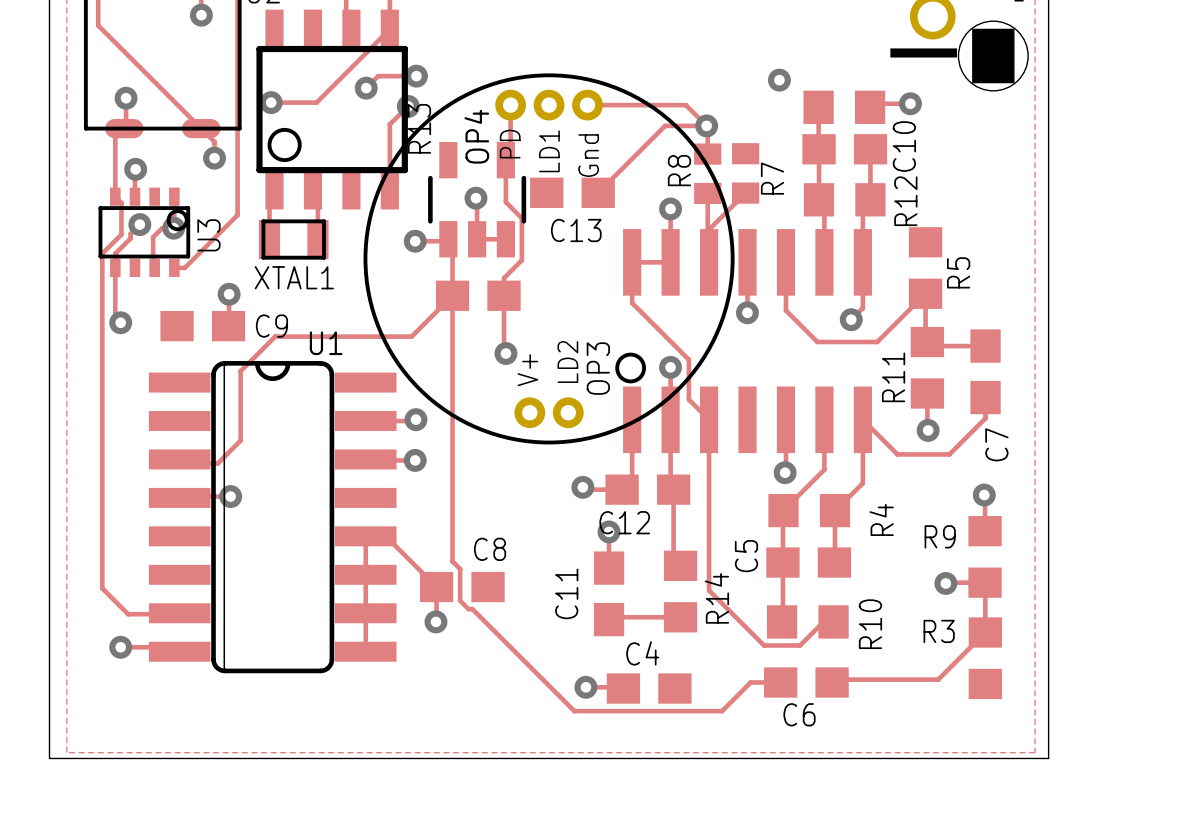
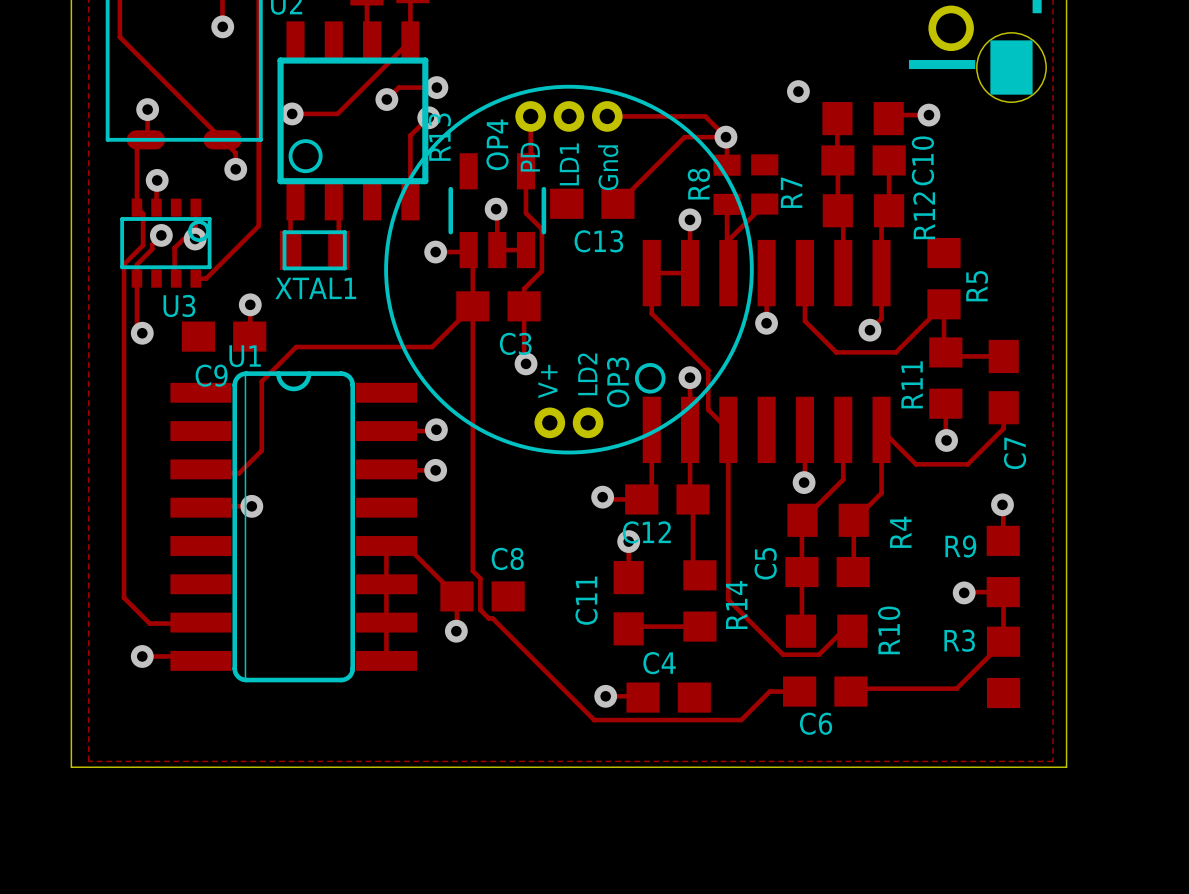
U3 name rotation: 0° (208, 235) -> 90° clockwise (179, 305)
U3 name position: U3 (208, 235) -> U3 (179, 305)
C9 name position: C9 (271, 326) -> C9 (211, 375)
C3 name: none -> C3 (515, 343)
U1 name position: U1 (326, 343) -> U1 (245, 356)

